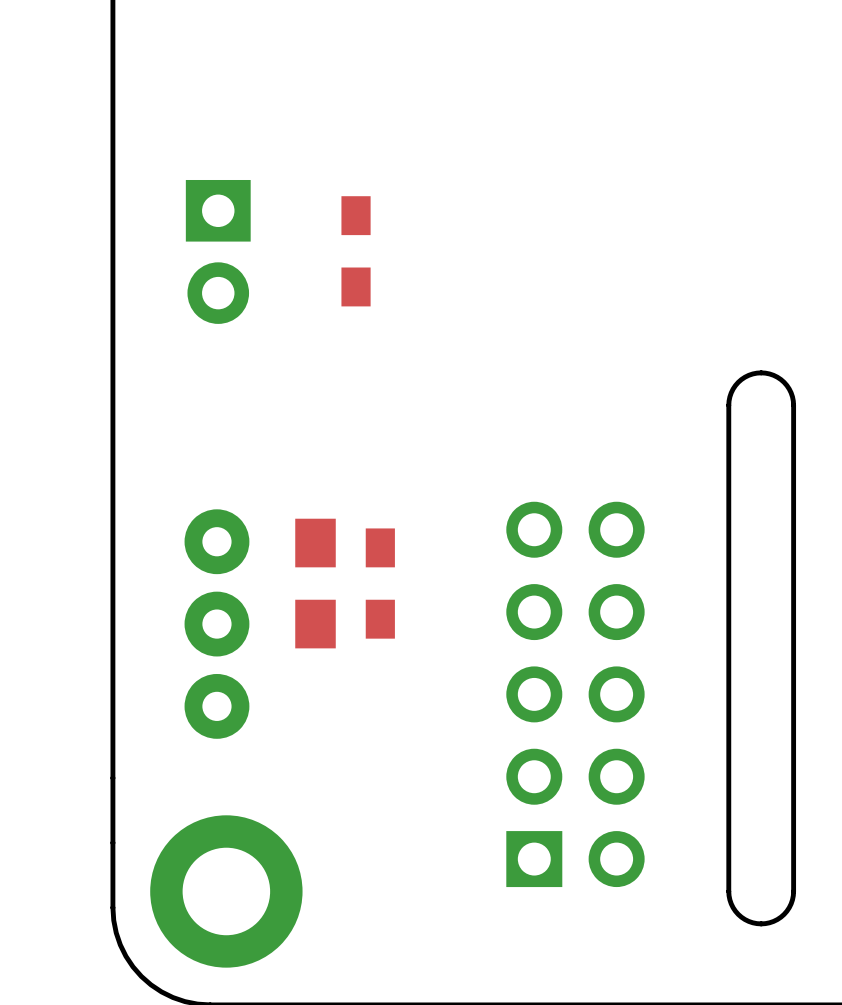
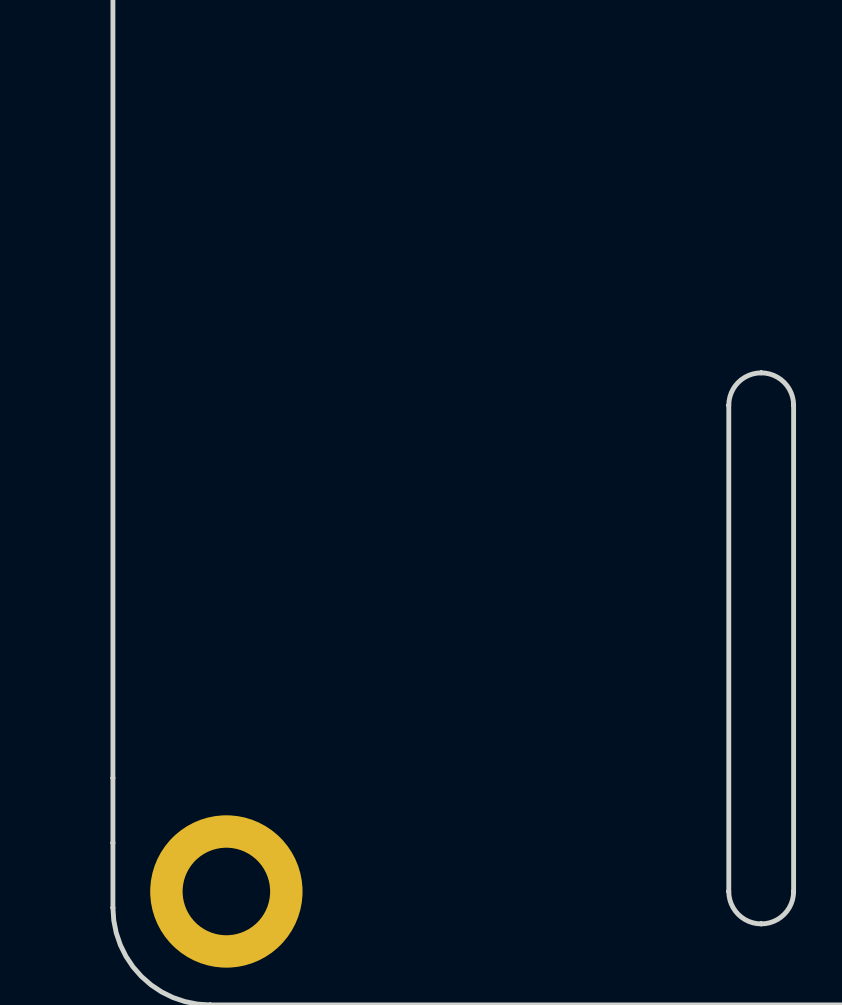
part: (218, 251) -> none
part: (356, 251) -> none
part: (315, 583) -> none
part: (380, 583) -> none
part: (216, 624) -> none
part: (575, 694) -> none

